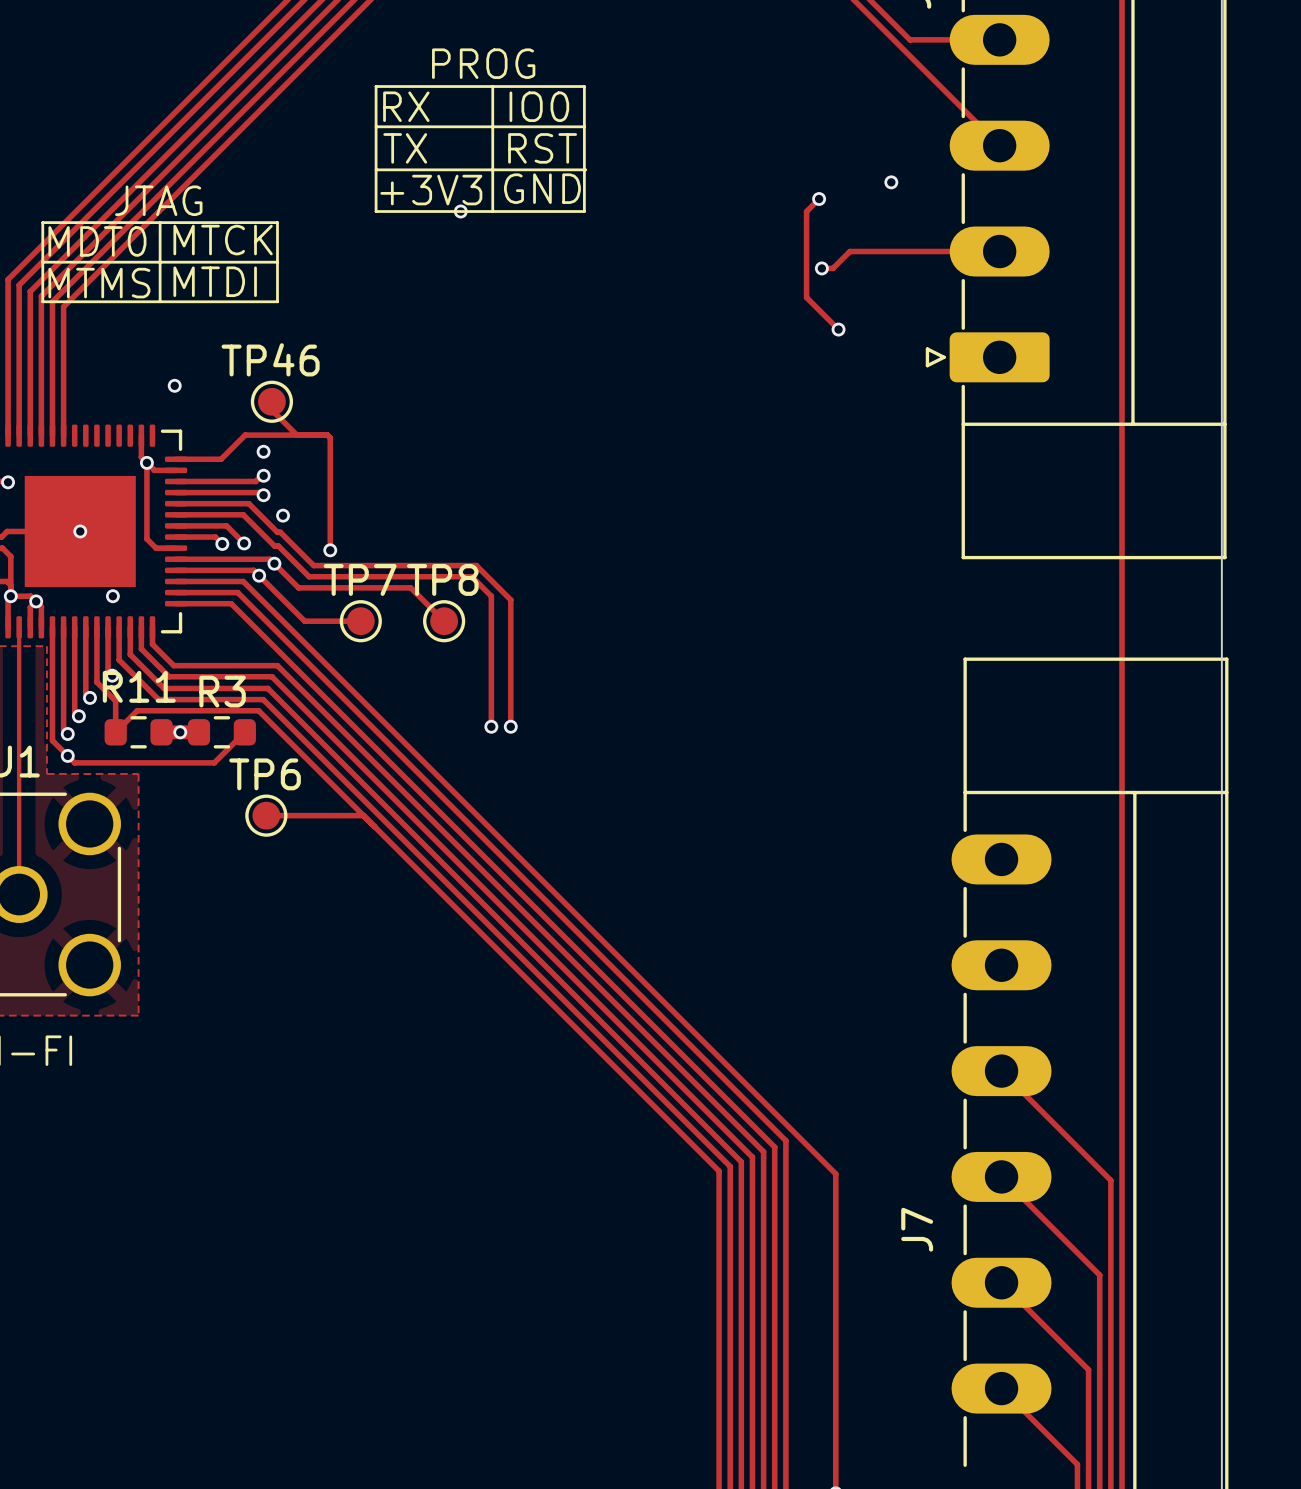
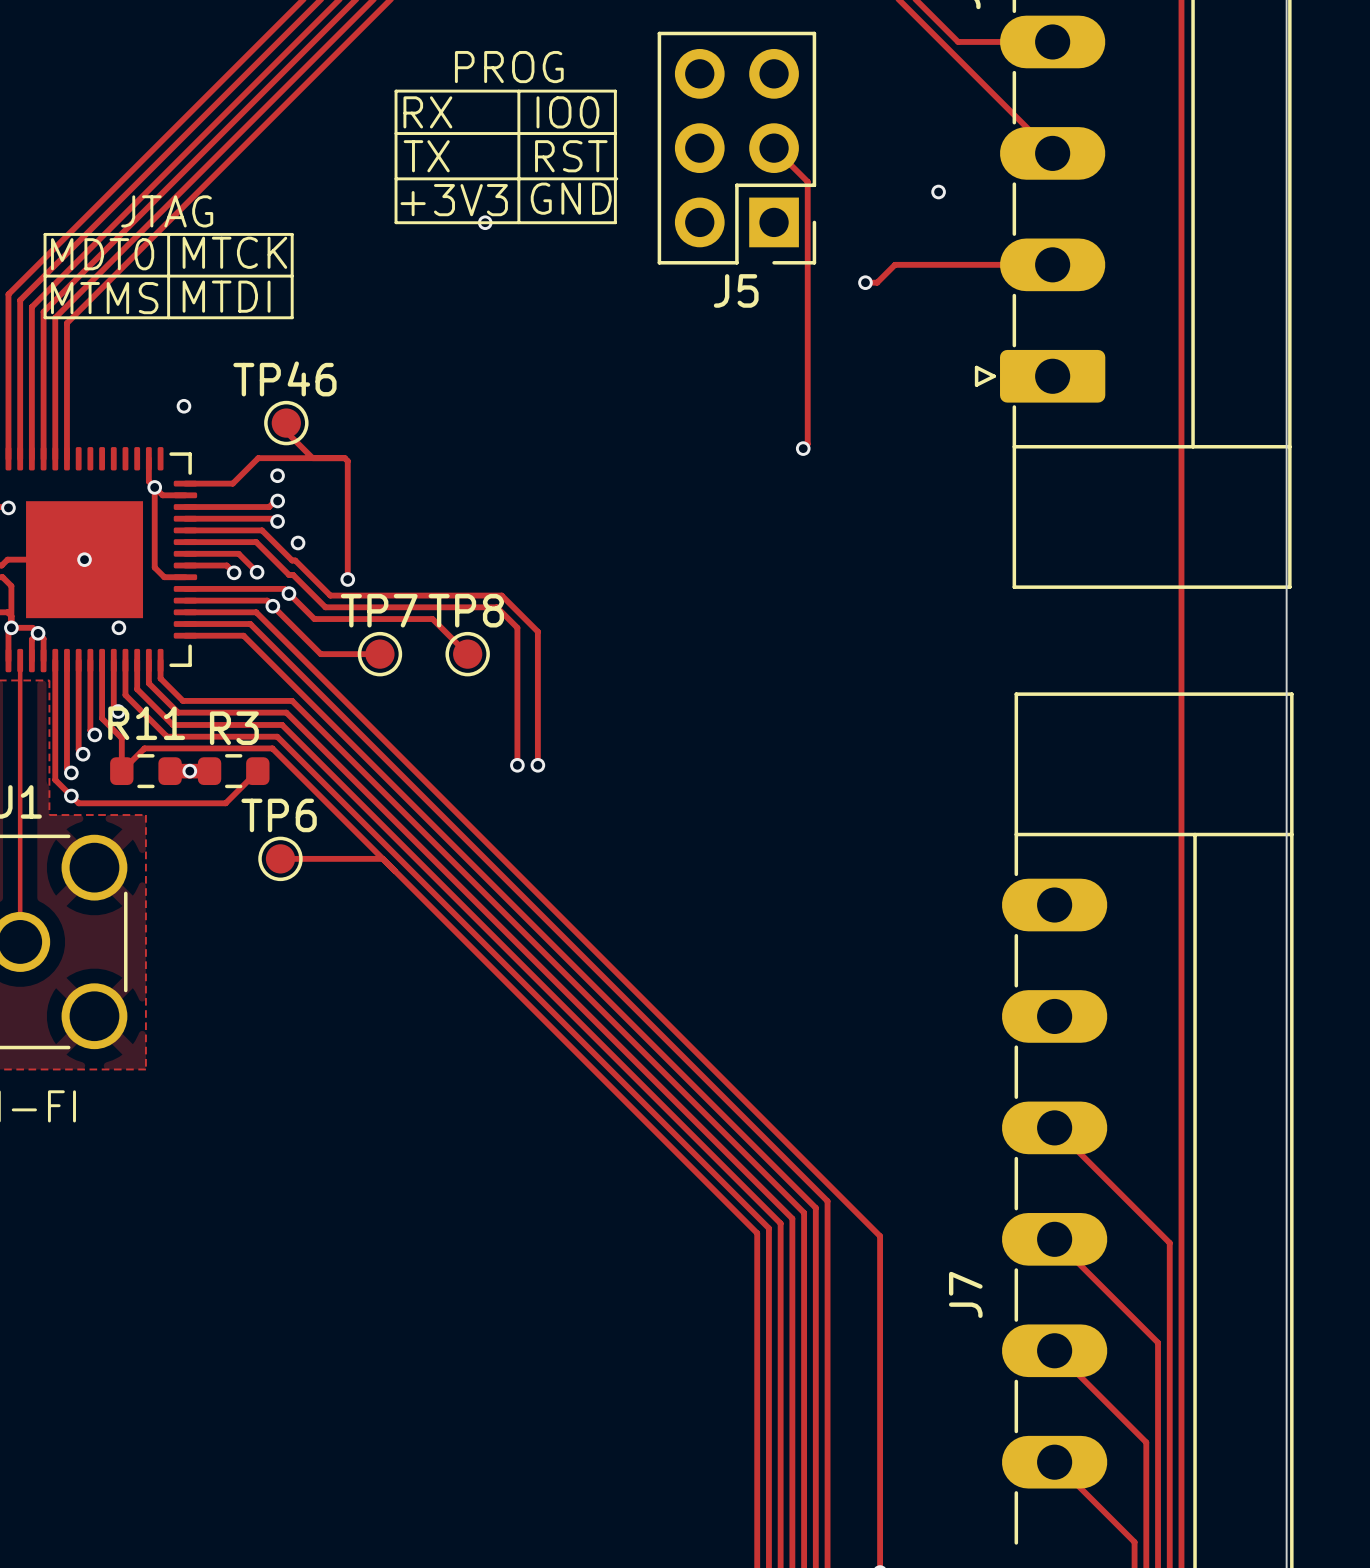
J5: none -> (736, 148)
track: none -> (774, 148) (807, 181) (807, 444) (803, 448)
track: (819, 199) (806, 211) (806, 297) (838, 329) -> none
via: (819, 199) -> none
via: (838, 329) -> none
via: none -> (803, 448)

